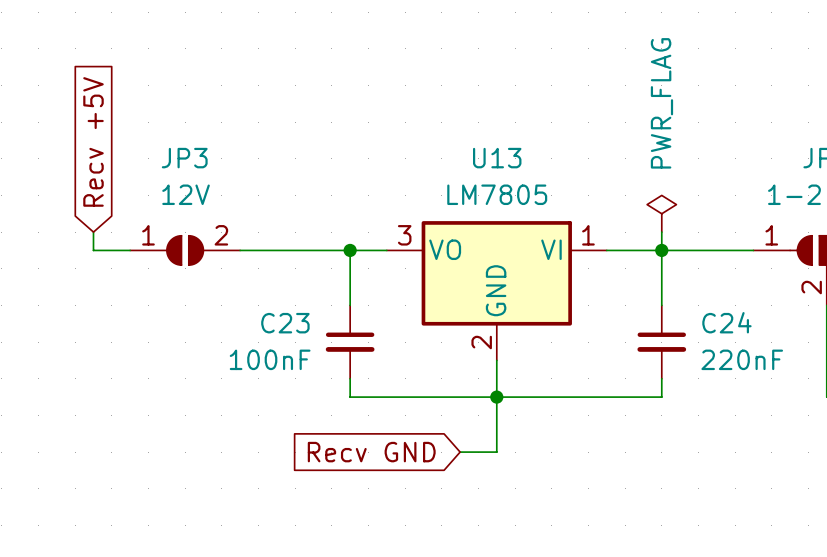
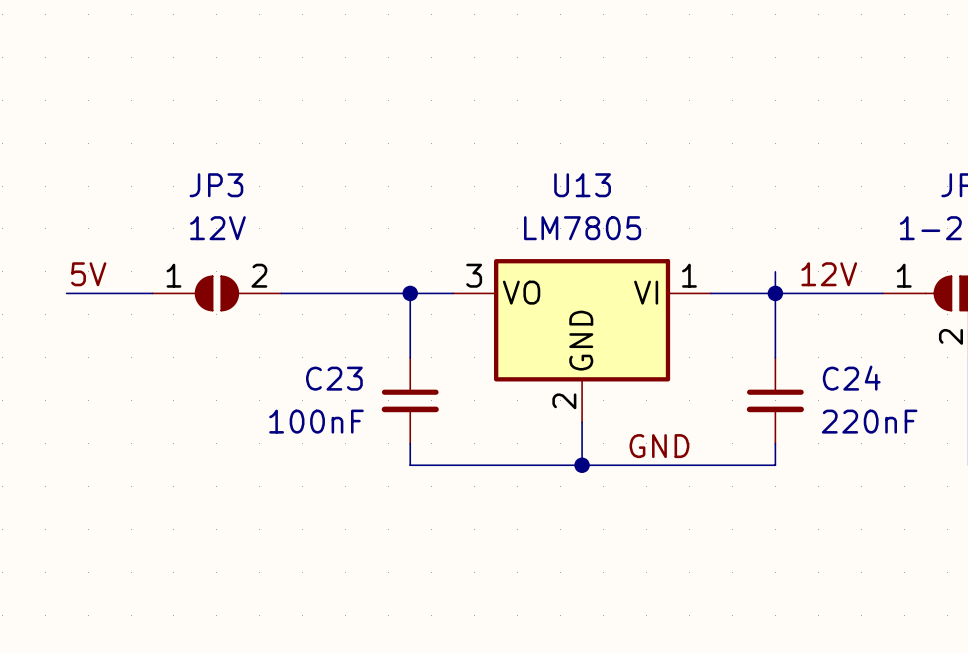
global label: Recv +5V (93, 141) -> none
power symbol: PWR_FLAG (661, 213) -> none
wire: (93, 232) (93, 250) -> (66, 293) (109, 293)
label: none -> 5V (88, 274)
label: none -> 12V (829, 274)
label: none -> GND (659, 446)
wire: (496, 397) (496, 452) (460, 452) -> none
global label: Recv GND (371, 452) -> none

